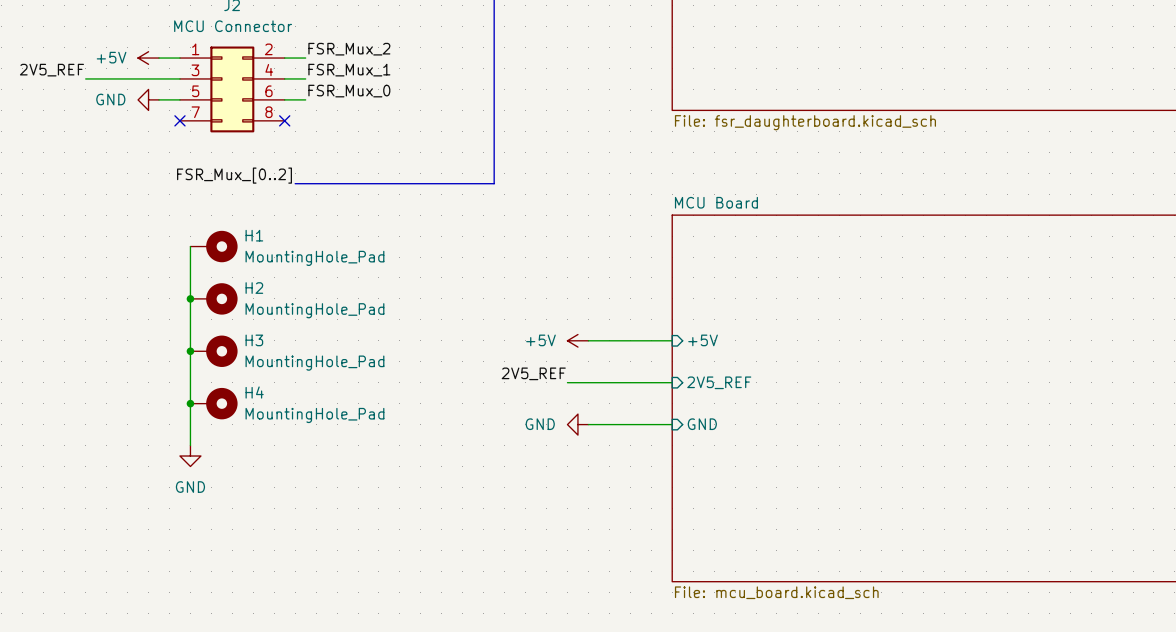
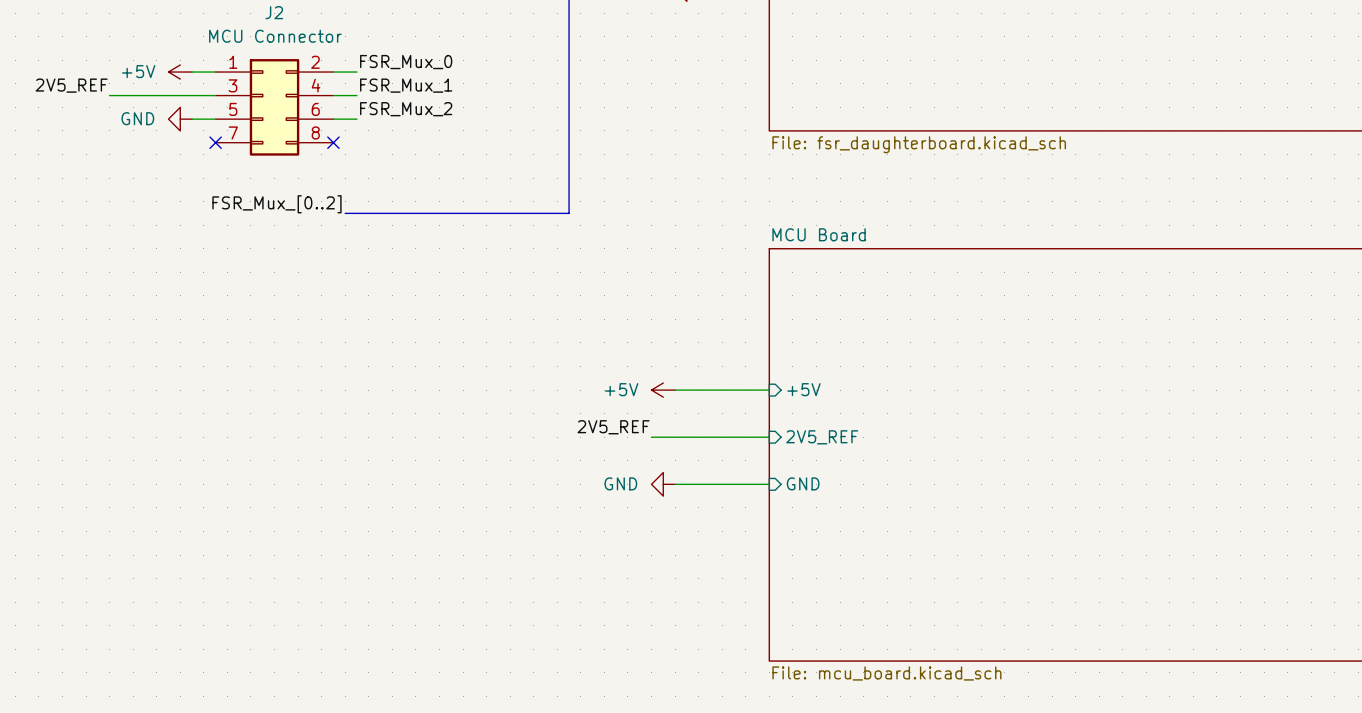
label: FSR_Mux_2 (349, 49) -> FSR_Mux_0 (406, 62)
label: FSR_Mux_0 (349, 91) -> FSR_Mux_2 (406, 109)
wire: (190, 246) (190, 445) -> none
H1: MountingHole_Pad (214, 246) -> none
junction: (190, 298) -> none
H2: MountingHole_Pad (214, 298) -> none
junction: (190, 351) -> none
H3: MountingHole_Pad (214, 351) -> none
junction: (190, 403) -> none
H4: MountingHole_Pad (214, 403) -> none
power symbol: GND (190, 456) -> none

